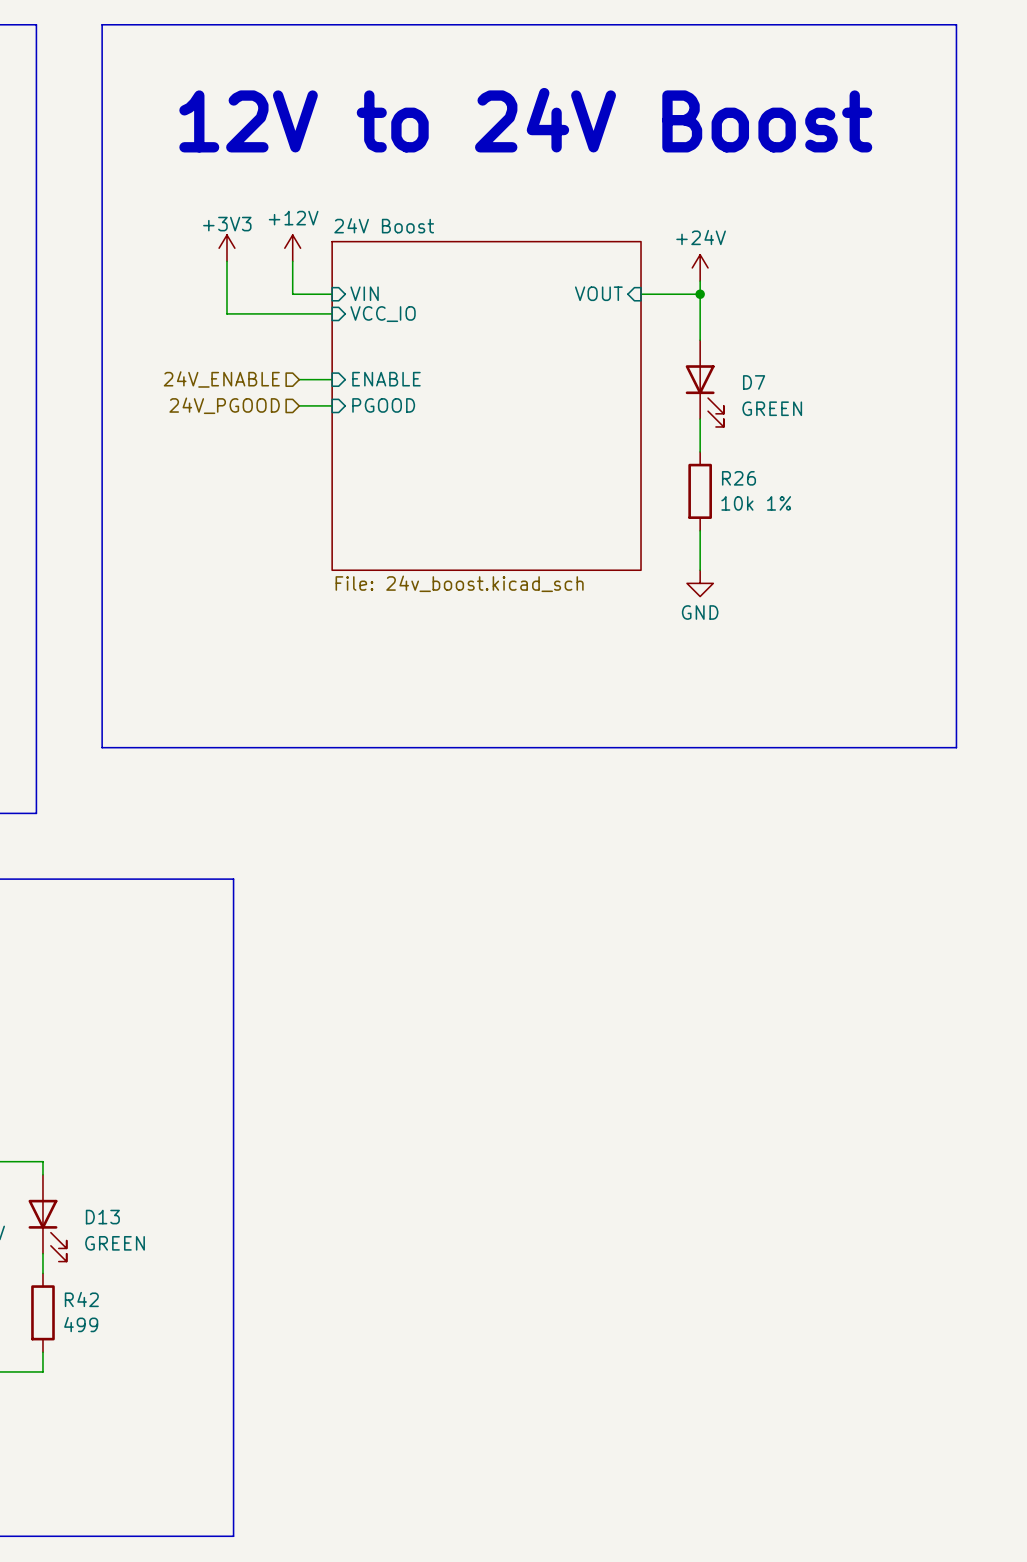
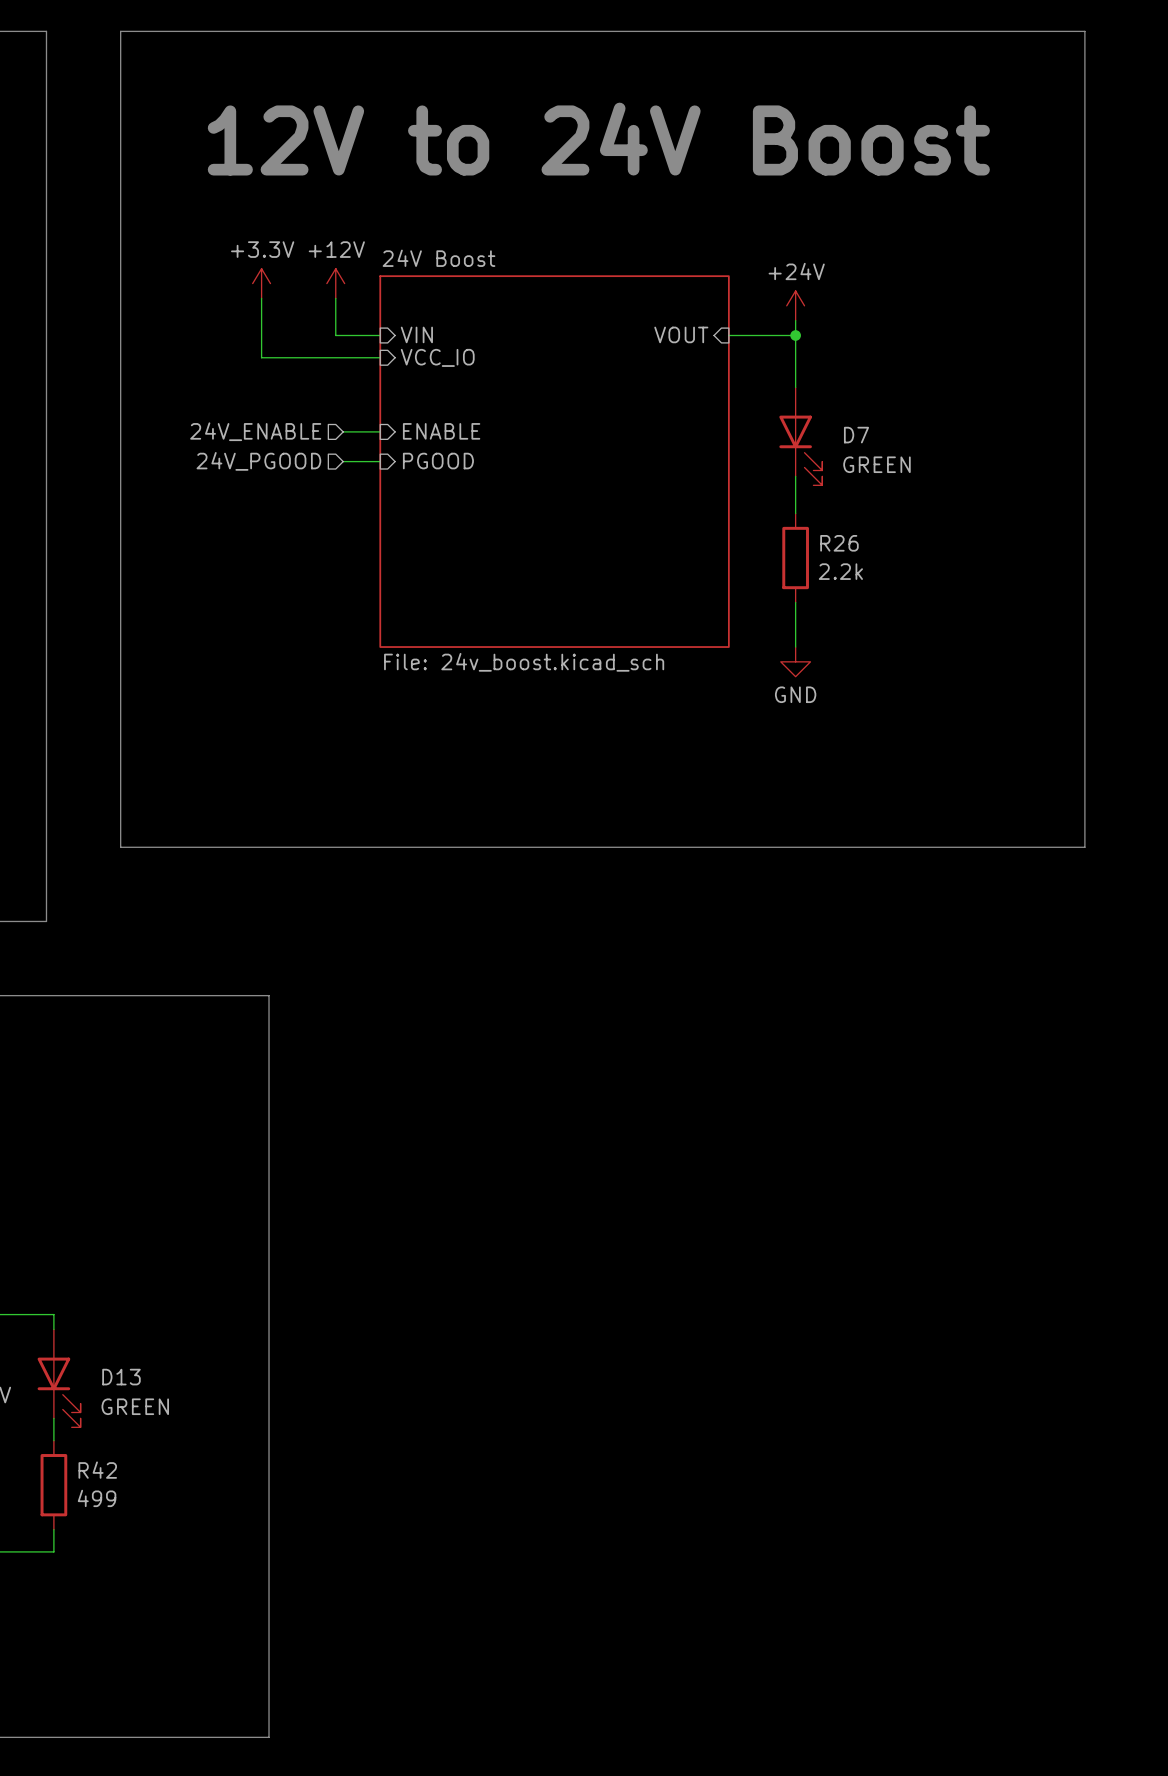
power symbol: +3V3 (226, 248) -> +3.3V (261, 283)
R26 value: 10k 1% (756, 503) -> 2.2k (840, 571)

